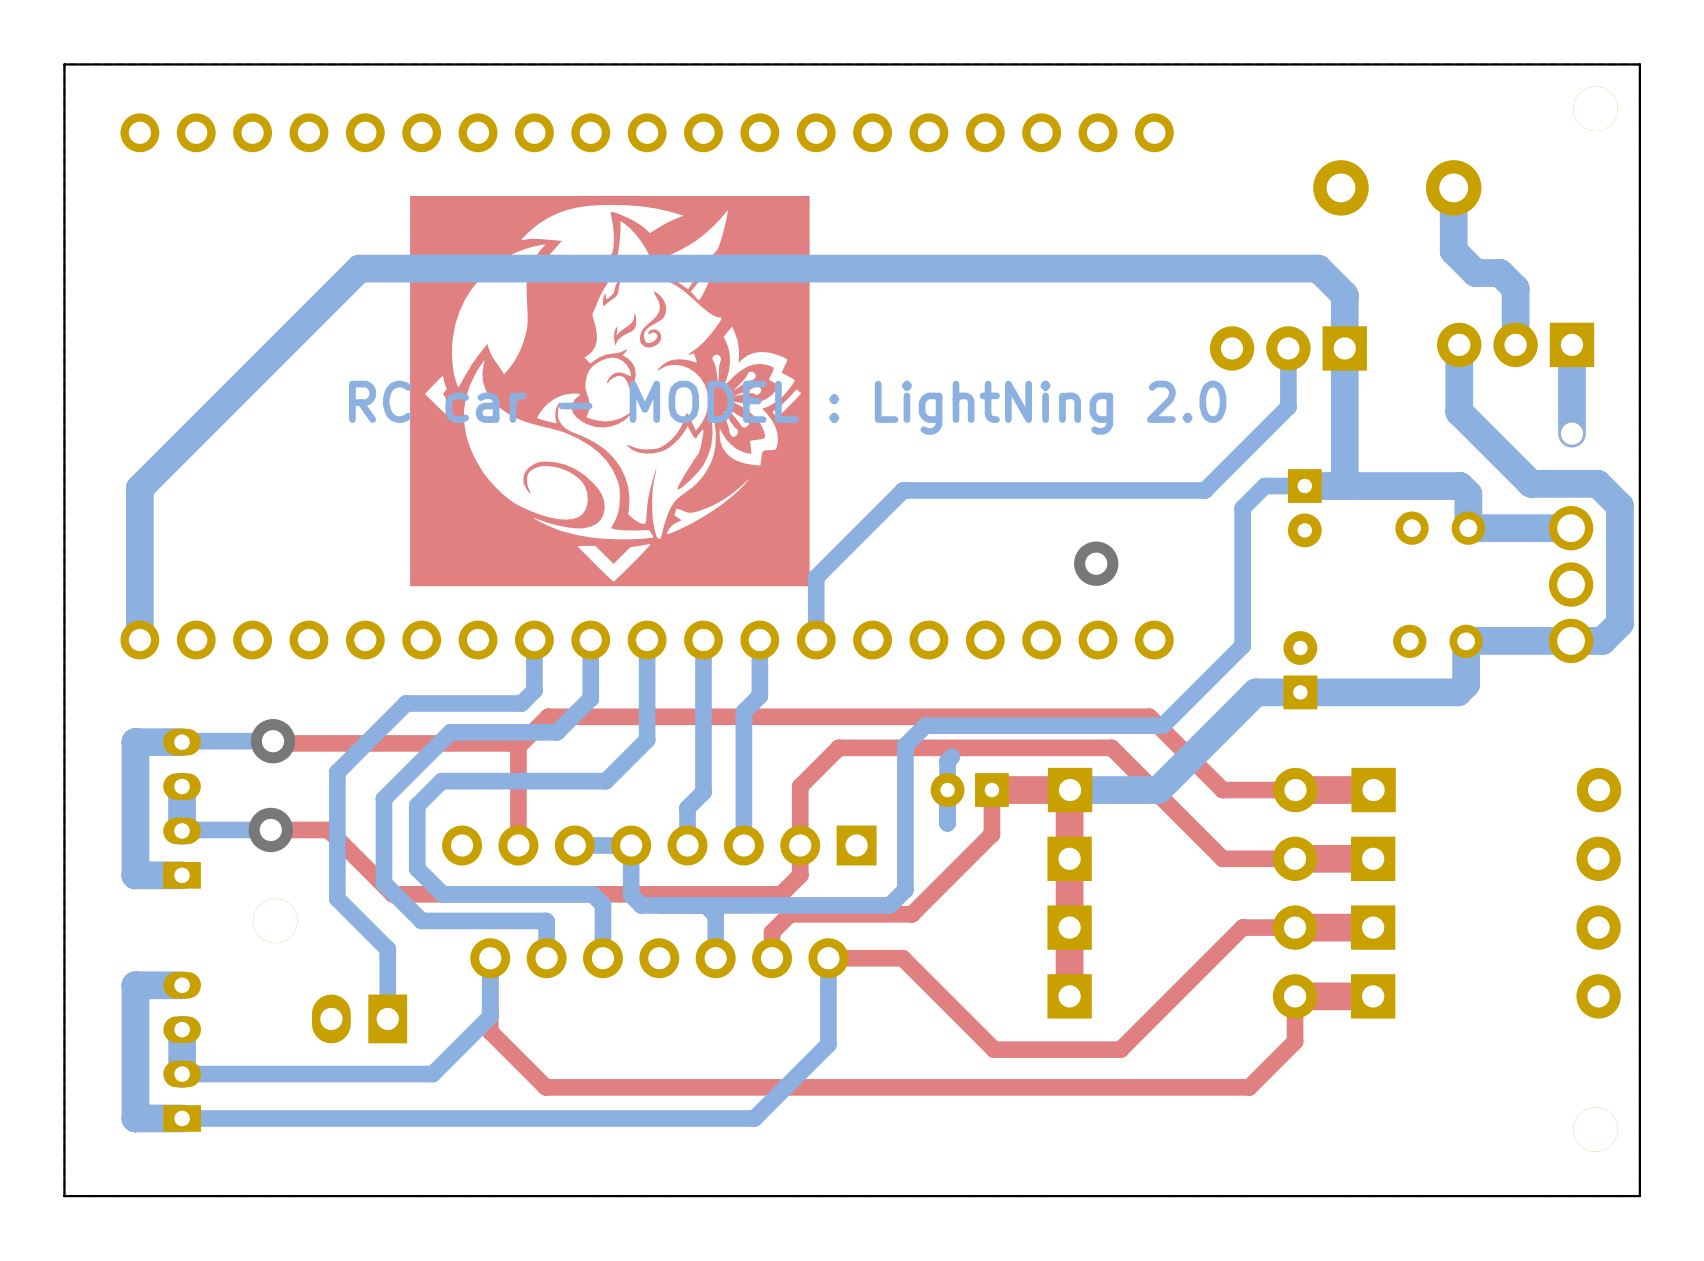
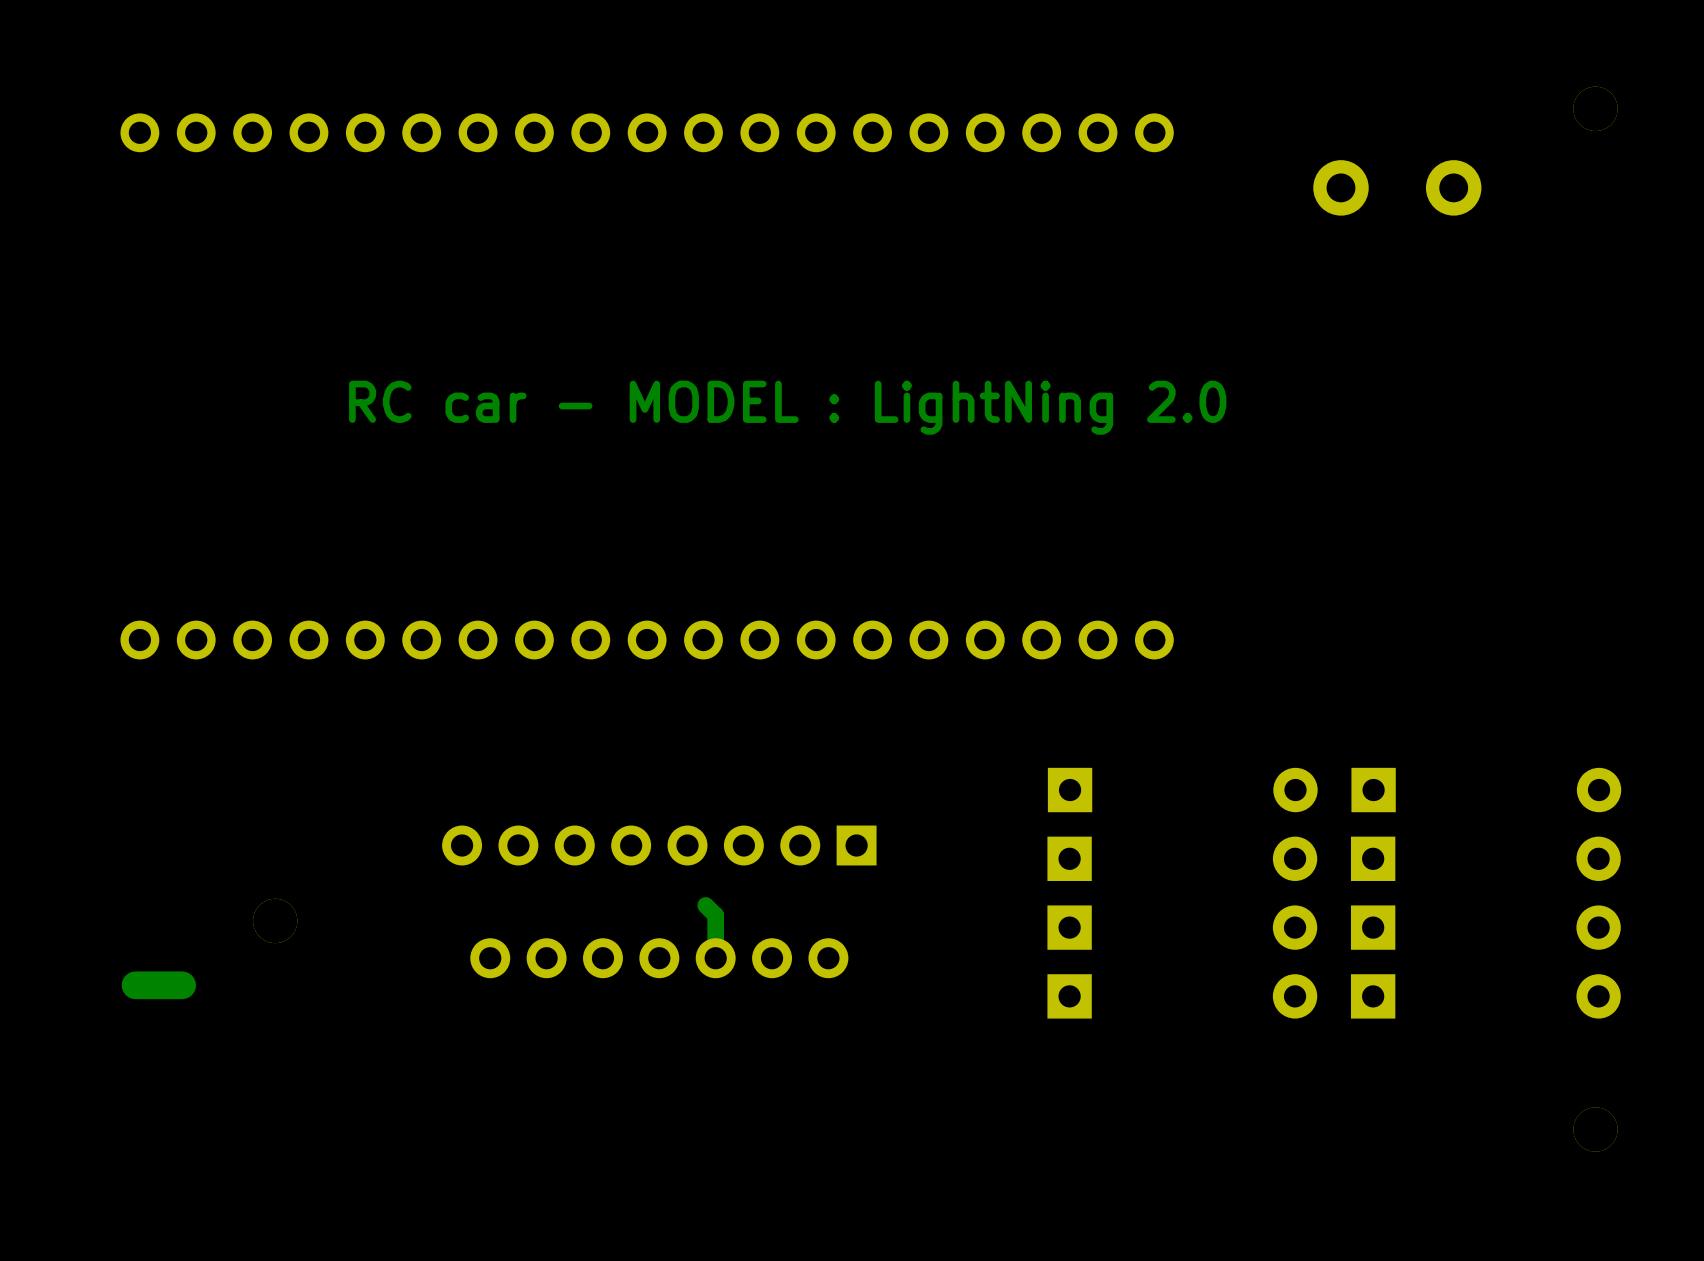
board edge: (1639, 64) (64, 64) (64, 1196) (1639, 1196) (1639, 64) -> none
bottom track: (1453, 187) (1453, 251) (1475, 273) (1500, 273) (1515, 288) (1515, 344) -> none
drawing: [410, 195, 810, 587] -> none
bottom track: (1459, 344) (1459, 411) (1531, 483) (1597, 483) (1619, 506) (1619, 623) (1602, 640) (1466, 640) (1466, 684) (1457, 692) (1256, 692) (1158, 790) (1070, 790) -> none
part: (1515, 344) -> none
bottom track: (1571, 344) (1571, 433) -> none
bottom track: (1288, 348) (1288, 407) (1204, 490) (903, 490) (816, 577) (816, 640) -> none
part: (1288, 348) -> none
part: (1571, 433) -> none
bottom track: (1351, 486) (1344, 479) (1344, 295) (1318, 268) (359, 268) (139, 488) (139, 640) -> none
part: (1304, 508) -> none
part: (1440, 528) -> none
bottom track: (1571, 528) (1468, 528) (1468, 494) (1460, 486) (1264, 486) (1242, 508) (1242, 645) (1162, 725) (925, 725) (905, 745) (905, 889) (889, 905) (641, 905) (631, 895) (631, 845) (574, 845) -> none
via: (1096, 563) -> none
part: (1571, 584) -> none
bottom track: (534, 640) (534, 690) (521, 703) (406, 703) (337, 772) (337, 898) (387, 949) (387, 1018) -> none
bottom track: (590, 640) (590, 698) (557, 732) (450, 732) (383, 798) (383, 883) (421, 920) (545, 920) (546, 958) -> none
bottom track: (647, 640) (647, 739) (605, 781) (441, 781) (417, 805) (417, 868) (442, 894) (592, 894) (602, 904) (602, 958) -> none
bottom track: (703, 640) (703, 792) (687, 808) (687, 845) -> none
bottom track: (759, 640) (759, 695) (743, 711) (743, 845) -> none
part: (1437, 641) -> none
part: (1300, 670) -> none
top track: (273, 741) (275, 743) (515, 743) (518, 746) -> none
bottom track: (273, 741) (135, 742) (135, 875) (182, 875) -> none
via: (273, 741) -> none
top track: (518, 746) (518, 845) -> none
top track: (518, 746) (548, 716) (1149, 716) (1222, 790) (1373, 790) -> none
bottom track: (952, 756) (947, 761) (947, 823) -> none
bottom track: (182, 786) (182, 830) (270, 829) -> none
part: (969, 790) -> none
part: (182, 808) -> none
top track: (270, 829) (328, 829) (392, 894) (781, 894) (800, 875) (800, 786) (838, 747) (1111, 747) (1222, 858) (1373, 858) -> none
via: (270, 829) -> none
top track: (1373, 927) (1242, 927) (1120, 1049) (994, 1049) (902, 958) (828, 958) -> none
top track: (490, 958) (490, 1031) (545, 1087) (1249, 1087) (1295, 1041) (1295, 996) (1373, 996) -> none
bottom track: (490, 958) (490, 1016) (432, 1074) (182, 1074) (182, 1029) -> none
top track: (772, 958) (772, 932) (790, 914) (912, 914) (991, 834) (991, 790) (1070, 790) (1069, 996) -> none
bottom track: (828, 958) (828, 1044) (754, 1118) (135, 1118) -> none
bottom track: (135, 985) (135, 1118) -> none
part: (359, 1018) -> none
part: (182, 1051) -> none

